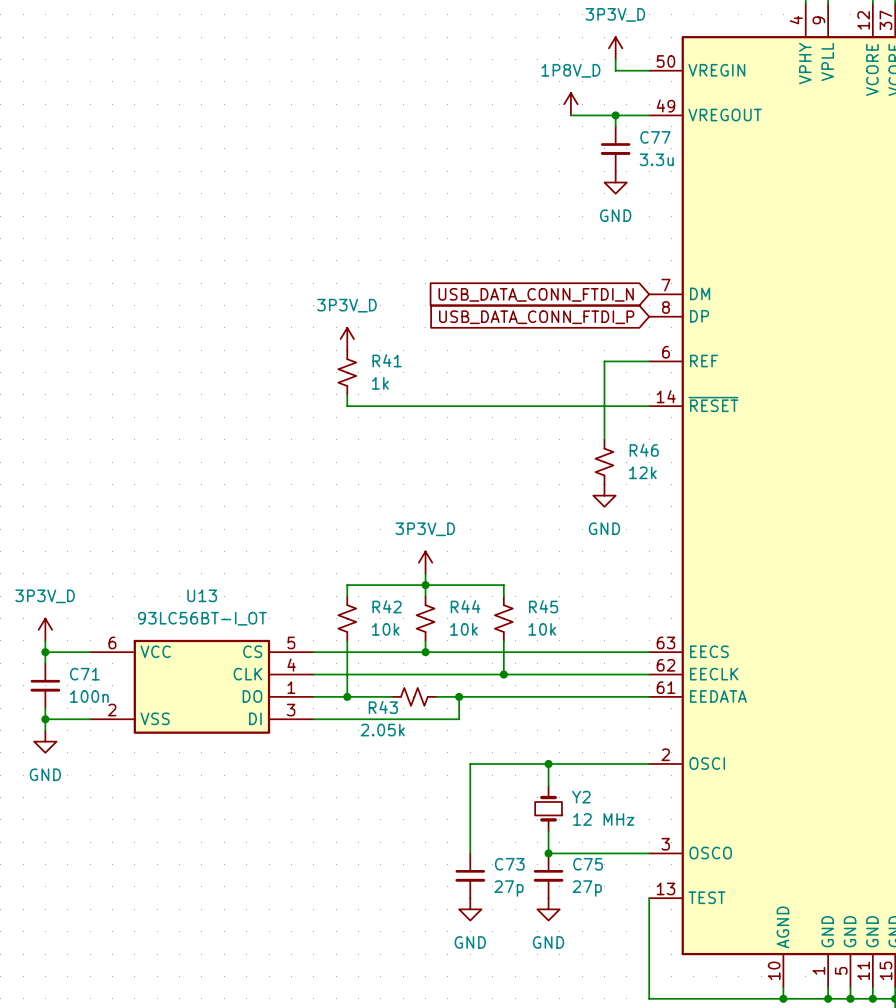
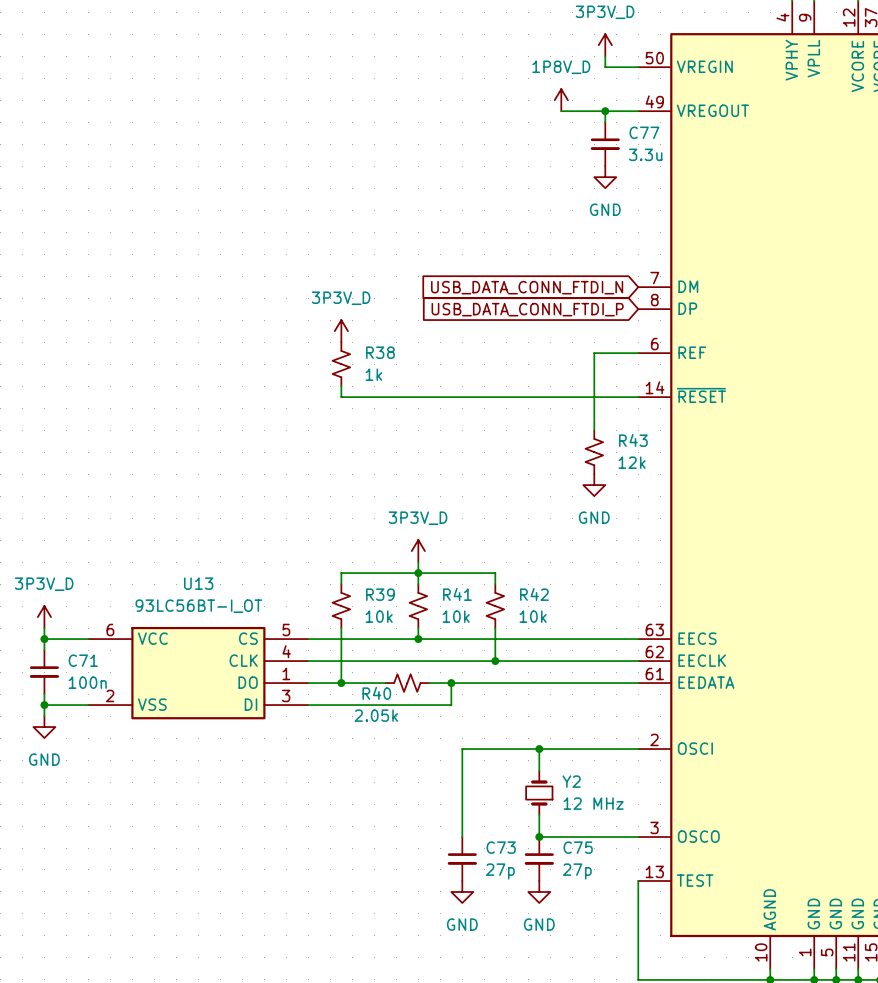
R41 name: R41 (387, 360) -> R38 (380, 352)
R46 name: R46 (644, 450) -> R43 (633, 440)
R42 name: R42 (387, 606) -> R39 (380, 594)
R44 name: R44 (465, 606) -> R41 (457, 594)
R45 name: R45 (543, 606) -> R42 (534, 594)
R43 name: R43 (383, 707) -> R40 (376, 693)

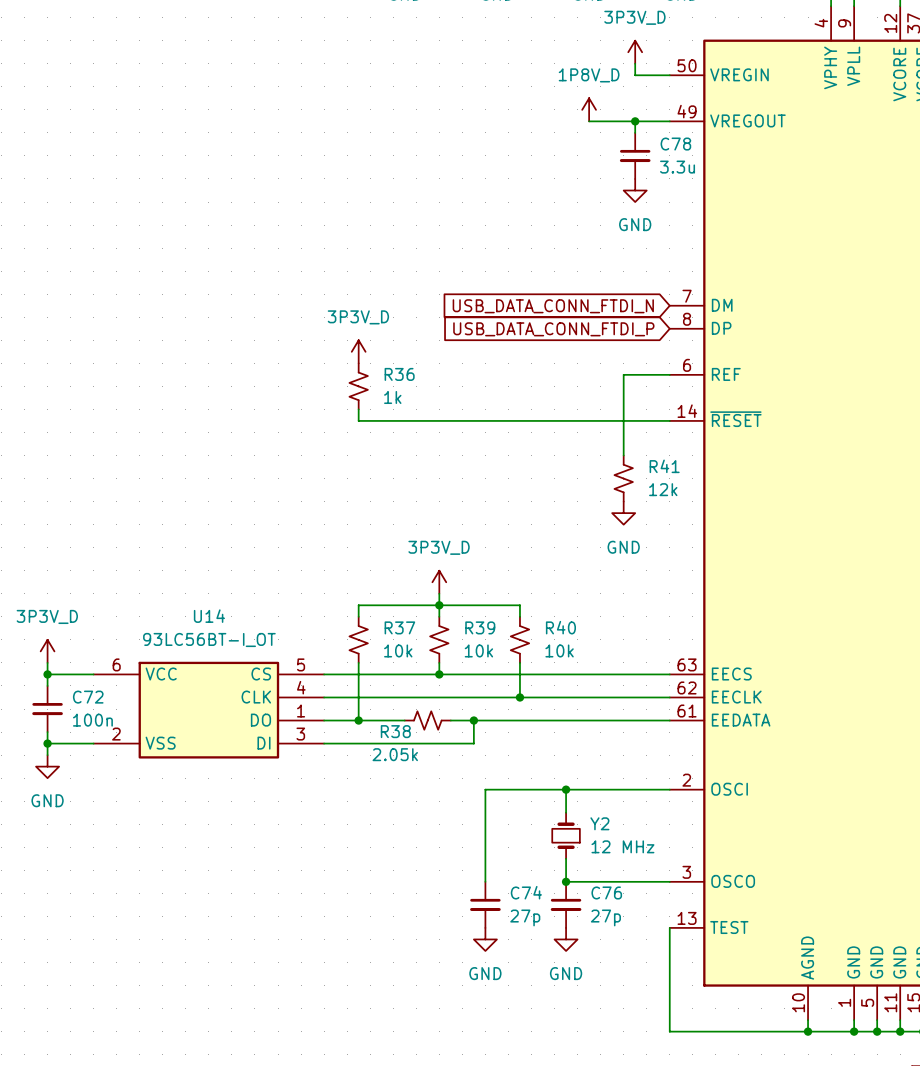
C77 name: C77 (644, 132) -> C78 (675, 144)
R38 name: R38 (380, 352) -> R36 (399, 374)
R43 name: R43 (633, 440) -> R41 (664, 466)
U13 name: U13 (198, 583) -> U14 (209, 616)
R39 name: R39 (380, 594) -> R37 (399, 627)
R41 name: R41 (457, 594) -> R39 (480, 627)
R42 name: R42 (534, 594) -> R40 (560, 627)
C71 name: C71 (83, 660) -> C72 (88, 697)
R40 name: R40 (376, 693) -> R38 (395, 731)
C73 name: C73 (501, 847) -> C74 (526, 892)
C75 name: C75 (578, 847) -> C76 (606, 892)

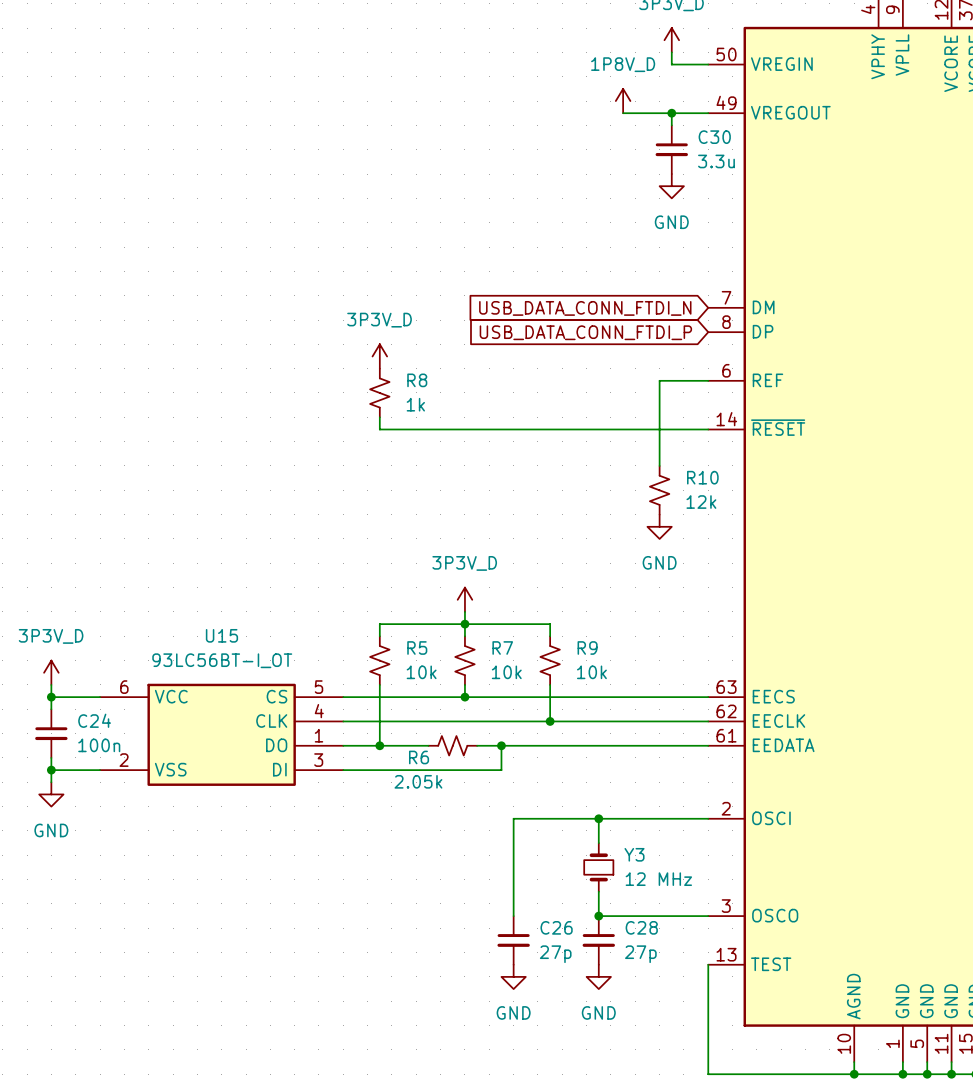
C78 name: C78 (675, 144) -> C30 (714, 137)
R36 name: R36 (399, 374) -> R8 (417, 380)
R41 name: R41 (664, 466) -> R10 (702, 477)
U14 name: U14 (209, 616) -> U15 (221, 635)
R37 name: R37 (399, 627) -> R5 (417, 648)
R39 name: R39 (480, 627) -> R7 (502, 648)
R40 name: R40 (560, 627) -> R9 (587, 648)
C72 name: C72 (88, 697) -> C24 (94, 720)
R38 name: R38 (395, 731) -> R6 (419, 757)
Y2 name: Y2 (599, 823) -> Y3 (634, 854)
C74 name: C74 (526, 892) -> C26 (556, 927)
C76 name: C76 (606, 892) -> C28 (641, 927)

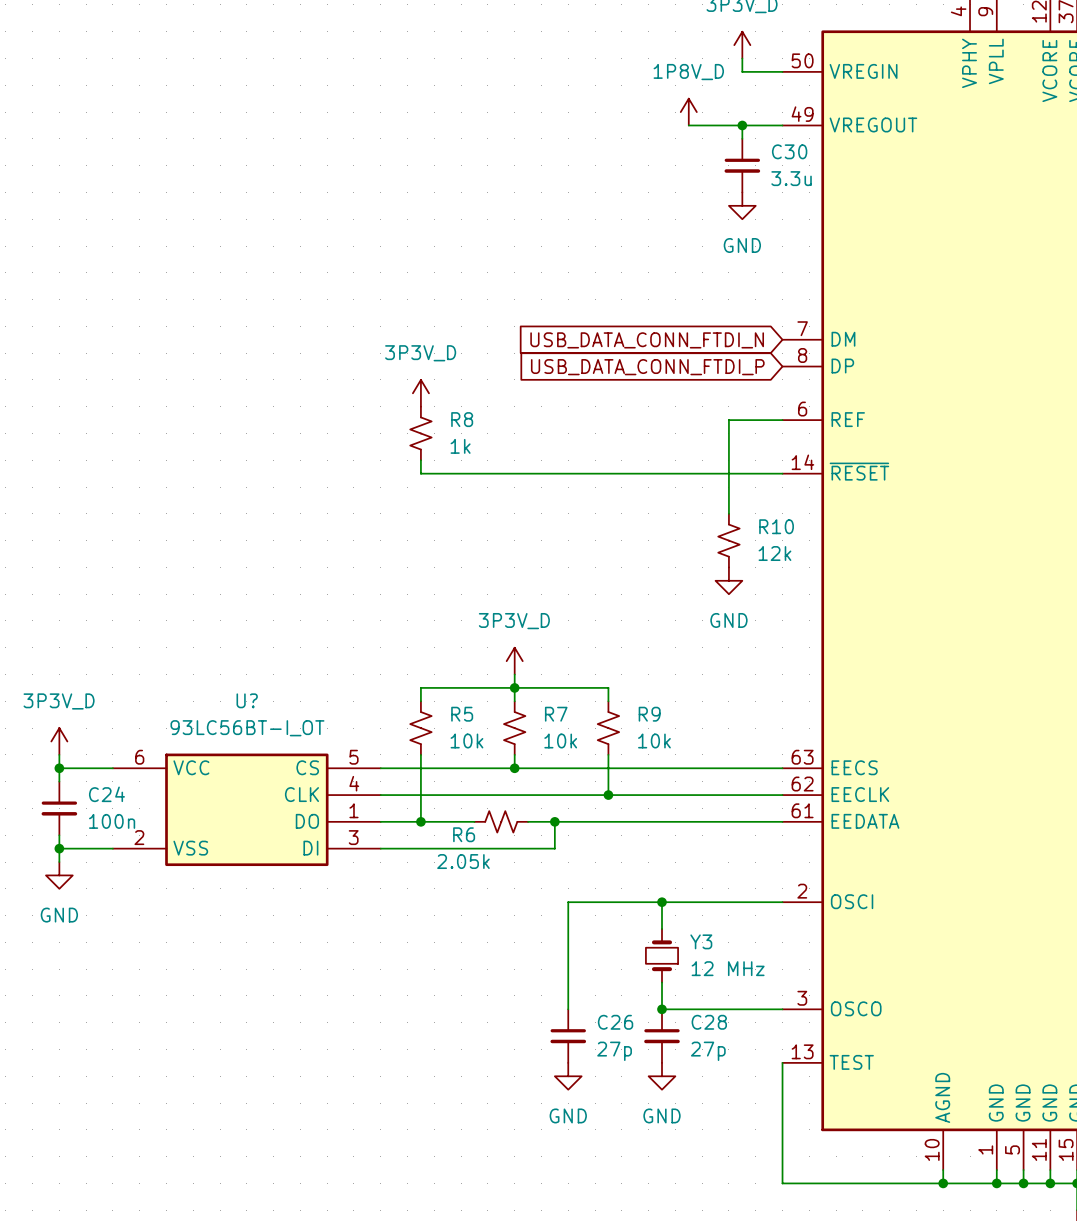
U15 name: U15 (221, 635) -> U? (247, 700)

